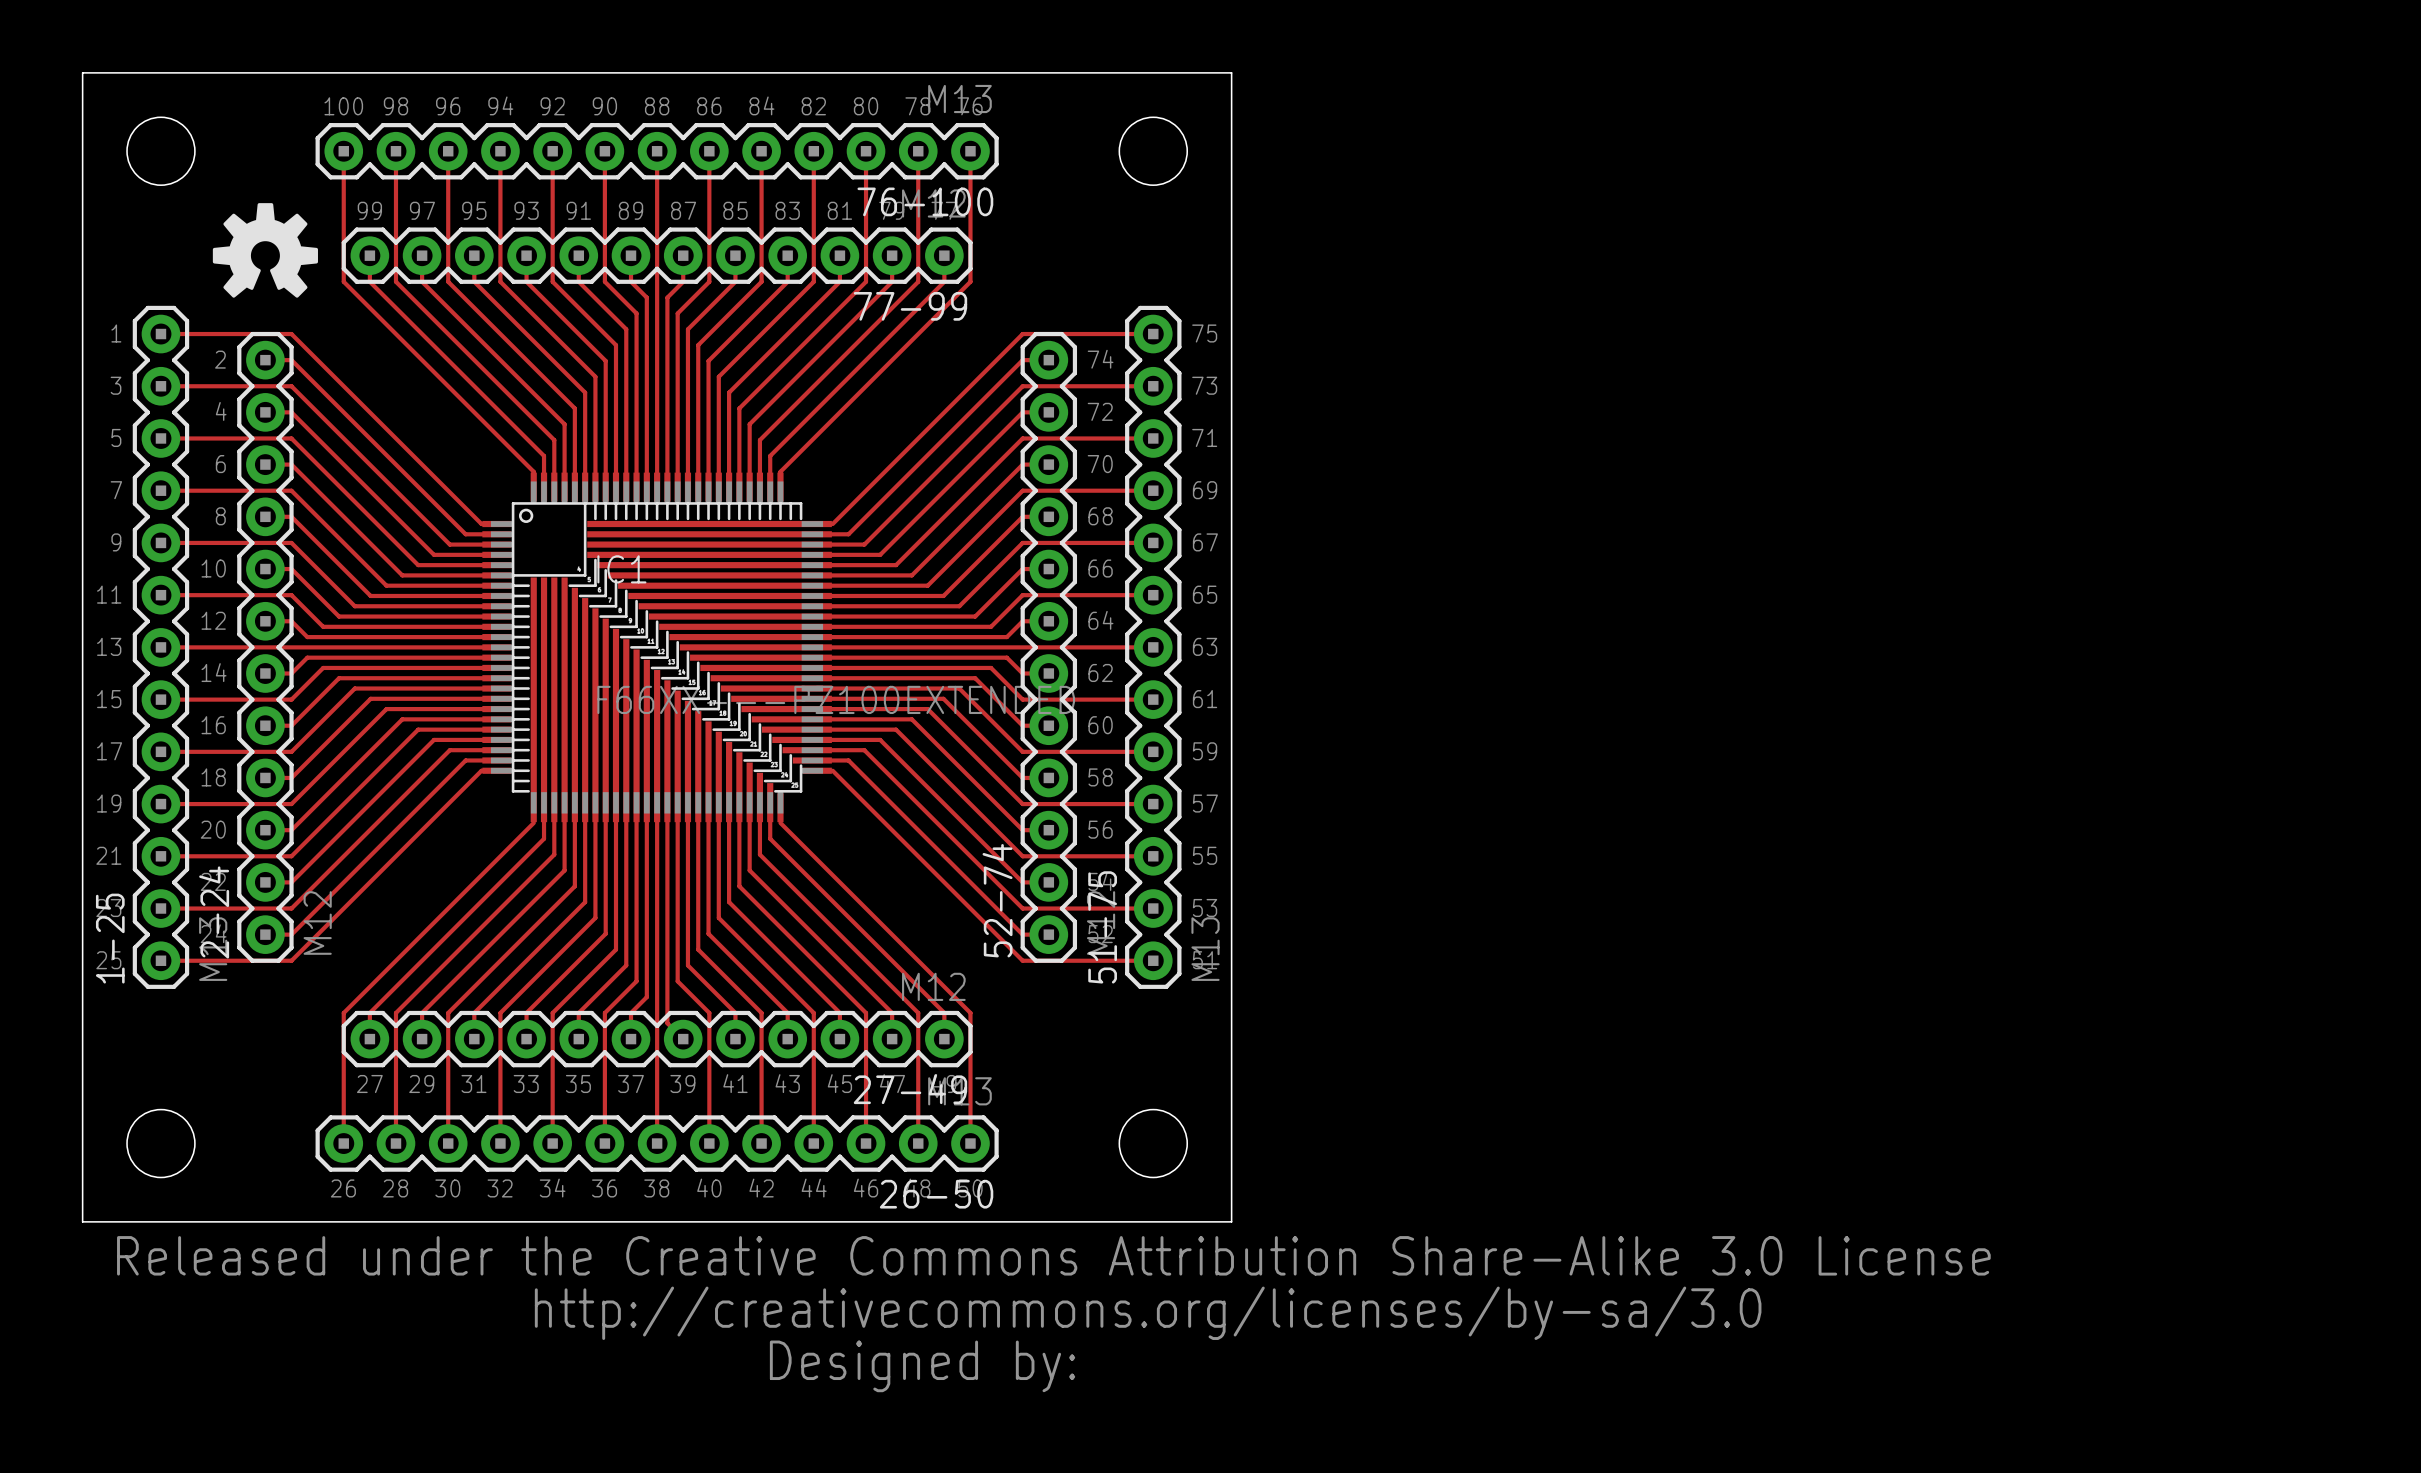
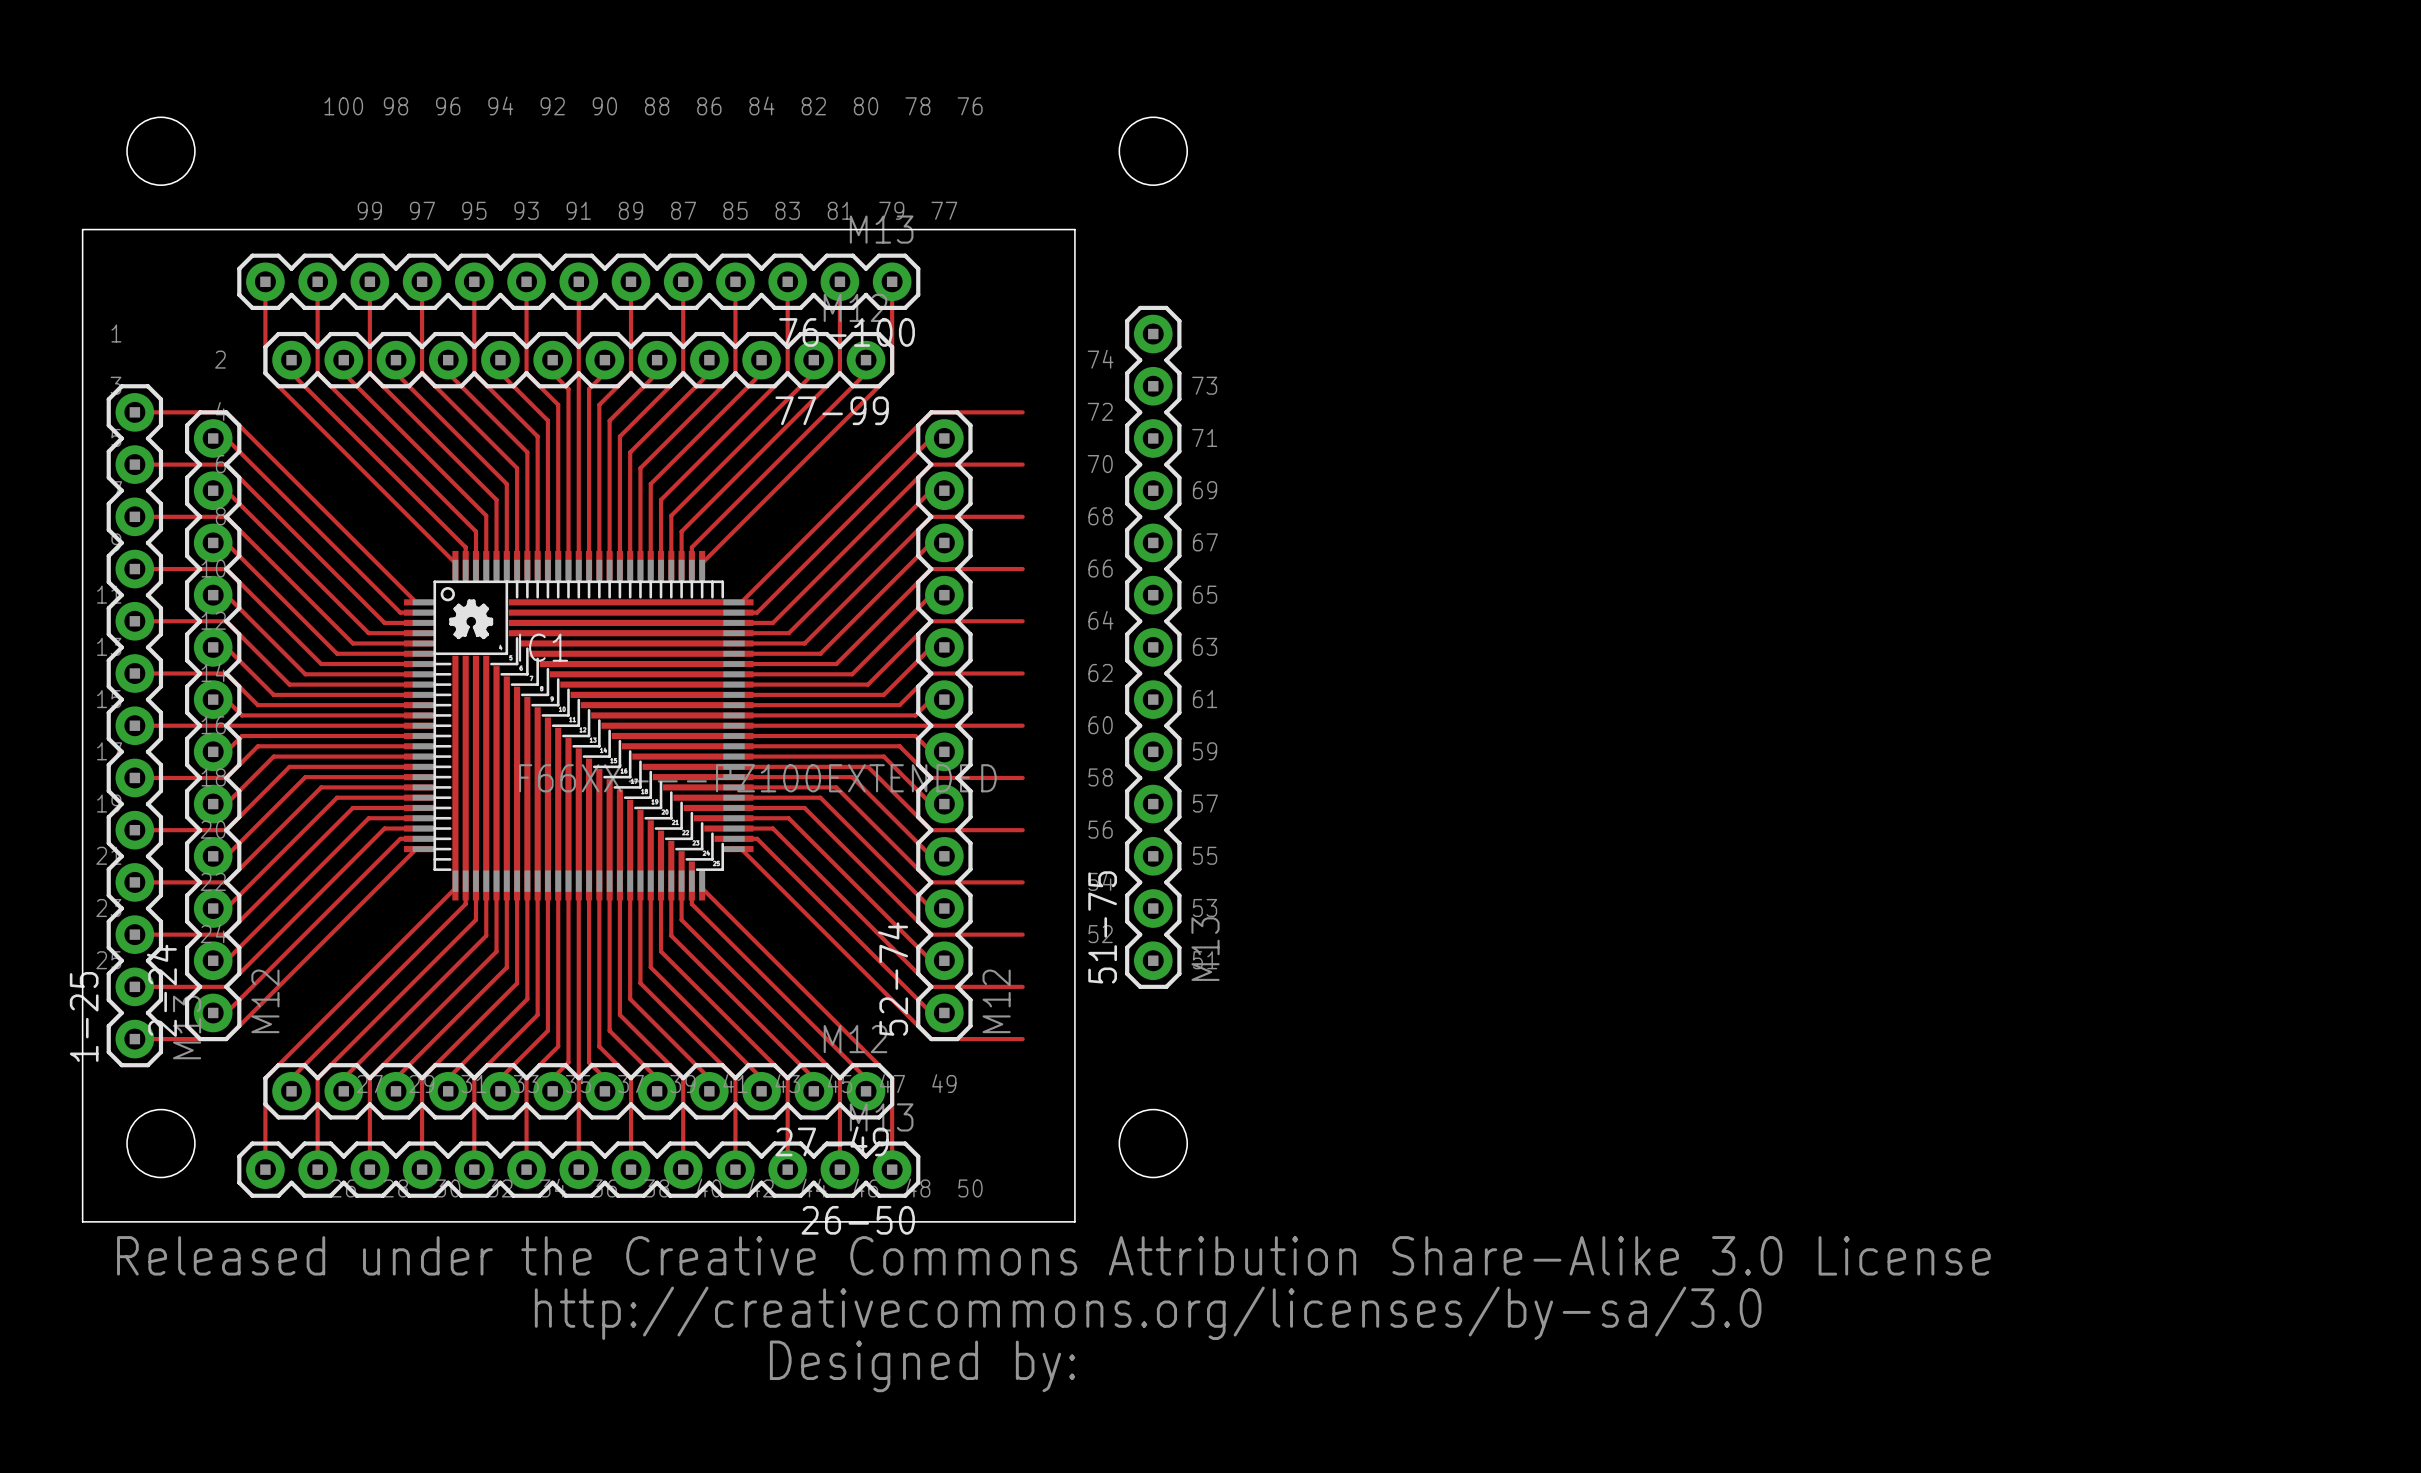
track: (343, 151) (343, 281) (533, 471) (533, 487) -> none
track: (395, 151) (395, 281) (554, 440) (554, 487) -> none
track: (448, 151) (448, 281) (574, 408) (574, 487) -> none
track: (500, 151) (500, 281) (595, 376) (595, 487) -> none
track: (552, 151) (552, 281) (616, 345) (616, 487) -> none
track: (604, 151) (604, 281) (636, 313) (636, 487) -> none
track: (657, 151) (657, 360) -> none
76-100 position: (657, 151) -> (578, 281)
track: (709, 151) (709, 281) (677, 313) (677, 487) -> none
track: (761, 151) (761, 281) (698, 345) (698, 487) -> none
track: (813, 151) (813, 281) (718, 376) (718, 487) -> none
track: (866, 151) (866, 281) (739, 408) (739, 487) -> none
track: (918, 151) (918, 281) (759, 440) (759, 487) -> none
track: (970, 151) (970, 281) (780, 471) (780, 487) -> none
drawing: [212, 203, 318, 298] -> none
board edge: (82, 229) (82, 72) (1231, 72) (1231, 1221) (1074, 1221) -> (82, 229) (1074, 229) (1074, 1221)
track: (369, 255) (369, 281) (544, 455) (544, 487) -> none
track: (422, 255) (422, 281) (564, 424) (564, 487) -> none
track: (474, 255) (474, 281) (585, 392) (585, 487) -> none
track: (526, 255) (526, 281) (605, 360) (605, 487) -> none
track: (578, 255) (578, 281) (626, 329) (626, 487) -> none
track: (631, 255) (631, 281) (646, 297) (646, 487) -> none
77-99 position: (657, 255) -> (578, 360)
track: (683, 255) (683, 281) (667, 297) (667, 487) -> none
track: (735, 255) (735, 281) (687, 329) (687, 487) -> none
track: (787, 255) (787, 281) (708, 360) (708, 487) -> none
track: (839, 255) (839, 281) (729, 392) (729, 487) -> none
track: (892, 255) (892, 281) (749, 424) (749, 487) -> none
track: (944, 255) (944, 281) (770, 455) (770, 487) -> none
track: none -> (265, 281) (265, 373) (455, 563) (455, 565)
track: none -> (317, 281) (317, 373) (475, 531) (475, 565)
track: none -> (369, 281) (369, 373) (496, 499) (496, 565)
track: none -> (422, 281) (422, 373) (517, 468) (517, 565)
track: none -> (474, 281) (474, 373) (537, 436) (537, 565)
track: none -> (526, 281) (526, 373) (558, 404) (558, 565)
track: none -> (578, 281) (578, 565)
track: none -> (631, 281) (631, 373) (599, 404) (599, 565)
track: none -> (683, 281) (683, 373) (619, 436) (619, 565)
track: none -> (735, 281) (735, 373) (640, 468) (640, 565)
track: none -> (787, 281) (787, 373) (661, 499) (661, 565)
track: none -> (839, 281) (839, 373) (681, 531) (681, 565)
track: none -> (892, 281) (892, 373) (702, 563) (702, 565)
text: 75 (1204, 333) -> none
track: (160, 334) (291, 334) (481, 524) (496, 524) -> none
track: (1153, 334) (1022, 334) (832, 524) (709, 524) -> none
track: (265, 360) (291, 360) (465, 534) (496, 534) -> none
track: none -> (291, 360) (291, 373) (465, 547) (465, 565)
track: none -> (343, 360) (343, 373) (486, 515) (486, 565)
track: none -> (395, 360) (395, 373) (506, 484) (506, 565)
track: none -> (448, 360) (448, 373) (527, 452) (527, 565)
track: none -> (500, 360) (500, 373) (547, 420) (547, 565)
track: none -> (552, 360) (552, 373) (568, 389) (568, 565)
track: none -> (604, 360) (604, 373) (589, 389) (589, 565)
track: none -> (709, 360) (709, 373) (630, 452) (630, 565)
track: none -> (761, 360) (761, 373) (650, 484) (650, 565)
track: none -> (813, 360) (813, 373) (671, 515) (671, 565)
track: none -> (866, 360) (866, 373) (691, 547) (691, 565)
track: (1048, 360) (1022, 360) (848, 534) (709, 534) -> none
track: (657, 373) (657, 487) -> (657, 373) (609, 420) (609, 565)
track: (160, 386) (291, 386) (449, 544) (496, 544) -> none
track: (1153, 386) (1022, 386) (864, 544) (709, 544) -> none
track: none -> (134, 412) (226, 412) (416, 602) (418, 602)
track: (265, 412) (291, 412) (434, 554) (496, 554) -> none
track: none -> (1022, 412) (931, 412) (741, 602) (631, 602)
track: (1048, 412) (1022, 412) (880, 554) (709, 554) -> none
track: (160, 438) (213, 438) -> none
track: (226, 438) (291, 438) (418, 565) (496, 565) -> (226, 438) (400, 612) (418, 612)
track: none -> (944, 438) (931, 438) (757, 612) (631, 612)
track: (1153, 438) (1022, 438) (896, 565) (714, 565) -> none
track: none -> (134, 464) (226, 464) (384, 622) (418, 622)
track: (265, 464) (291, 464) (402, 575) (496, 575) -> none
track: none -> (1022, 464) (931, 464) (772, 622) (631, 622)
track: (1048, 464) (1022, 464) (911, 575) (719, 575) -> none
track: (160, 490) (213, 490) -> none
track: (226, 490) (291, 490) (386, 585) (496, 585) -> (226, 490) (368, 633) (418, 633)
track: none -> (944, 490) (931, 490) (788, 633) (631, 633)
track: (1153, 490) (1022, 490) (927, 585) (724, 585) -> none
track: none -> (134, 516) (226, 516) (352, 643) (418, 643)
track: (265, 516) (291, 516) (370, 595) (496, 595) -> none
track: none -> (1022, 516) (931, 516) (804, 643) (636, 643)
track: (1048, 516) (1022, 516) (943, 595) (730, 595) -> none
track: (160, 542) (213, 542) -> none
track: (226, 542) (291, 542) (354, 606) (496, 606) -> (226, 542) (337, 653) (418, 653)
track: none -> (944, 542) (931, 542) (820, 653) (641, 653)
track: (1153, 542) (1022, 542) (959, 606) (735, 606) -> none
track: none -> (134, 569) (226, 569) (321, 664) (418, 664)
track: (265, 569) (291, 569) (339, 616) (496, 616) -> none
track: none -> (1022, 569) (931, 569) (836, 664) (646, 664)
track: (1048, 569) (1022, 569) (975, 616) (740, 616) -> none
track: (160, 595) (213, 595) -> none
track: (226, 595) (291, 595) (323, 626) (496, 626) -> (226, 595) (305, 674) (418, 674)
track: none -> (944, 595) (931, 595) (852, 674) (651, 674)
track: (1153, 595) (1022, 595) (991, 626) (745, 626) -> none
drawing: none -> [449, 599, 494, 640]
track: none -> (134, 621) (226, 621) (289, 684) (418, 684)
track: (265, 621) (291, 621) (307, 637) (496, 637) -> none
track: none -> (1022, 621) (931, 621) (867, 684) (656, 684)
track: (1048, 621) (1022, 621) (1006, 637) (750, 637) -> none
track: (160, 647) (213, 647) -> none
1-25 position: (160, 647) -> (134, 725)
track: (226, 647) (496, 647) -> (226, 647) (273, 694) (418, 694)
2-24 position: (265, 647) -> (213, 725)
IC1 position: (657, 647) -> (578, 725)
track: (755, 647) (931, 647) -> (662, 694) (883, 694) (931, 647)
track: (944, 647) (1153, 647) -> none
52-74 position: (1048, 647) -> (944, 725)
track: (496, 657) (307, 657) (291, 673) (265, 673) -> none
track: (760, 657) (1006, 657) (1022, 673) (1048, 673) -> none
track: (496, 667) (323, 667) (291, 699) (226, 699) -> (418, 715) (242, 715) (226, 699)
track: (766, 667) (991, 667) (1022, 699) (1153, 699) -> none
track: none -> (134, 673) (226, 673) (257, 705) (418, 705)
track: none -> (1022, 673) (931, 673) (899, 705) (667, 705)
track: (496, 678) (339, 678) (291, 725) -> (418, 725) (291, 725)
track: (771, 678) (975, 678) (1022, 725) (1048, 725) -> none
track: (496, 688) (354, 688) (291, 751) (226, 751) -> (418, 736) (242, 736) (226, 751)
track: (776, 688) (959, 688) (1022, 751) (1153, 751) -> none
track: (496, 698) (370, 698) (291, 777) (265, 777) -> none
track: (781, 698) (943, 698) (1022, 777) (1048, 777) -> none
track: (160, 699) (213, 699) -> none
track: (533, 699) (533, 822) (343, 1012) (343, 1078) -> (486, 778) (486, 935) (343, 1078)
track: (544, 699) (544, 838) (369, 1012) (369, 1039) -> none
track: (554, 699) (554, 854) (395, 1012) (395, 1078) -> (506, 788) (506, 967) (395, 1078)
track: (564, 699) (564, 870) (422, 1012) (422, 1039) -> none
track: none -> (944, 699) (931, 699) (915, 715) (672, 715)
track: (574, 704) (574, 886) (448, 1012) (448, 1078) -> (527, 798) (527, 999) (448, 1078)
track: (496, 709) (386, 709) (291, 804) (226, 804) -> (418, 756) (273, 756) (226, 804)
track: (786, 709) (927, 709) (1022, 804) (1153, 804) -> none
track: (585, 710) (585, 902) (474, 1012) (474, 1039) -> none
track: (595, 715) (595, 917) (500, 1012) (500, 1078) -> (547, 809) (547, 1030) (500, 1078)
track: (496, 719) (402, 719) (291, 830) (265, 830) -> none
track: (791, 719) (911, 719) (1022, 830) (1048, 830) -> none
track: (605, 720) (605, 933) (526, 1012) (526, 1039) -> none
track: none -> (134, 725) (265, 725)
track: (616, 725) (616, 949) (552, 1012) (552, 1078) -> (568, 819) (568, 1062) (552, 1078)
track: none -> (677, 725) (1022, 725)
track: (496, 729) (418, 729) (291, 856) (226, 856) -> (418, 777) (305, 777) (226, 856)
track: (796, 729) (896, 729) (1022, 856) (1153, 856) -> none
track: (626, 730) (626, 965) (578, 1012) -> (578, 824) (578, 1012)
track: (636, 735) (636, 981) (604, 1012) (604, 1078) -> (589, 829) (589, 1062) (604, 1078)
track: none -> (682, 736) (915, 736) (931, 751) (944, 751)
track: (496, 739) (434, 739) (291, 882) (265, 882) -> none
track: (802, 739) (880, 739) (1022, 882) (1048, 882) -> none
track: (646, 740) (646, 997) (631, 1012) (631, 1039) -> none
track: none -> (418, 746) (257, 746) (226, 777) (134, 777)
track: (657, 746) (657, 1078) -> (609, 839) (609, 1030) (657, 1078)
track: none -> (687, 746) (899, 746) (931, 777) (1022, 777)
track: (496, 750) (449, 750) (291, 908) (226, 908) -> (418, 797) (337, 797) (226, 908)
track: (807, 750) (864, 750) (1022, 908) (1153, 908) -> none
track: (160, 751) (213, 751) -> none
track: (667, 751) (667, 1023) (683, 1039) -> none
track: (677, 756) (677, 981) (709, 1012) (709, 1078) -> (630, 850) (630, 999) (709, 1078)
track: none -> (692, 756) (883, 756) (931, 804) (944, 804)
track: (496, 760) (465, 760) (291, 934) (265, 934) -> none
track: (812, 760) (848, 760) (1022, 934) (1048, 934) -> none
track: (687, 761) (687, 965) (735, 1012) (735, 1039) -> none
track: none -> (418, 766) (289, 766) (226, 830) (134, 830)
track: (698, 766) (698, 949) (761, 1012) (761, 1078) -> (650, 860) (650, 967) (761, 1078)
track: none -> (698, 766) (867, 766) (931, 830) (1022, 830)
track: (496, 770) (481, 770) (291, 960) (226, 960) -> (418, 818) (368, 818) (226, 960)
track: (817, 770) (832, 770) (1022, 960) (1153, 960) -> none
track: (708, 771) (708, 933) (787, 1012) (787, 1039) -> none
track: (718, 776) (718, 917) (813, 1012) (813, 1078) -> (671, 870) (671, 935) (813, 1078)
track: none -> (703, 777) (852, 777) (931, 856) (944, 856)
track: none -> (455, 778) (455, 888) (265, 1078) (265, 1169)
track: none -> (465, 778) (465, 904) (291, 1078) (291, 1091)
track: none -> (475, 778) (475, 919) (317, 1078) (317, 1169)
track: (729, 782) (729, 902) (839, 1012) (839, 1039) -> none
track: none -> (496, 783) (496, 951) (369, 1078) (369, 1169)
track: none -> (418, 787) (321, 787) (226, 882) (134, 882)
track: none -> (708, 787) (836, 787) (931, 882) (1022, 882)
track: (739, 787) (739, 886) (866, 1012) (866, 1078) -> (691, 880) (691, 904) (866, 1078)
track: (749, 792) (749, 870) (892, 1012) (892, 1039) -> none
track: none -> (517, 793) (517, 983) (422, 1078) (422, 1169)
track: none -> (713, 797) (820, 797) (931, 908) (944, 908)
track: (759, 797) (759, 854) (918, 1012) (918, 1143) -> none
track: (770, 802) (770, 838) (944, 1012) (944, 1039) -> none
track: none -> (537, 803) (537, 1014) (474, 1078) (474, 1169)
track: (160, 804) (213, 804) -> none
track: none -> (418, 807) (352, 807) (226, 934) (134, 934)
track: none -> (718, 807) (804, 807) (931, 934) (1022, 934)
track: (780, 807) (780, 822) (970, 1012) (970, 1143) -> none
track: none -> (558, 814) (558, 1046) (526, 1078) (526, 1169)
track: none -> (723, 818) (788, 818) (931, 960) (944, 960)
track: none -> (418, 828) (384, 828) (226, 986) (134, 986)
track: none -> (728, 828) (772, 828) (931, 986) (1022, 986)
track: none -> (599, 834) (599, 1046) (631, 1078) (631, 1169)
track: none -> (418, 838) (400, 838) (226, 1012) (213, 1012)
track: none -> (734, 838) (757, 838) (931, 1012) (944, 1012)
track: none -> (619, 844) (619, 1014) (683, 1078) (683, 1169)
track: none -> (418, 849) (416, 849) (226, 1039) (134, 1039)
track: none -> (739, 849) (741, 849) (931, 1039) (1022, 1039)
track: none -> (640, 855) (640, 983) (735, 1078) (735, 1169)
track: (160, 856) (213, 856) -> none
track: none -> (661, 865) (661, 951) (787, 1078) (787, 1169)
track: none -> (681, 875) (681, 919) (839, 1078) (839, 1169)
track: none -> (702, 886) (702, 888) (892, 1078) (892, 1169)
track: (160, 908) (213, 908) -> none
track: (160, 960) (213, 960) -> none
track: none -> (578, 1039) (578, 1169)
27-49 position: (657, 1039) -> (578, 1091)
track: (343, 1091) (343, 1143) -> none
track: (395, 1091) (395, 1143) -> none
track: (448, 1091) (448, 1143) -> none
track: (500, 1091) (500, 1143) -> none
track: (552, 1091) (552, 1143) -> none
track: (604, 1091) (604, 1143) -> none
track: (657, 1091) (657, 1143) -> none
track: (709, 1091) (709, 1143) -> none
track: (761, 1091) (761, 1143) -> none
track: (813, 1091) (813, 1143) -> none
track: (866, 1091) (866, 1143) -> none
26-50 position: (657, 1143) -> (578, 1169)

